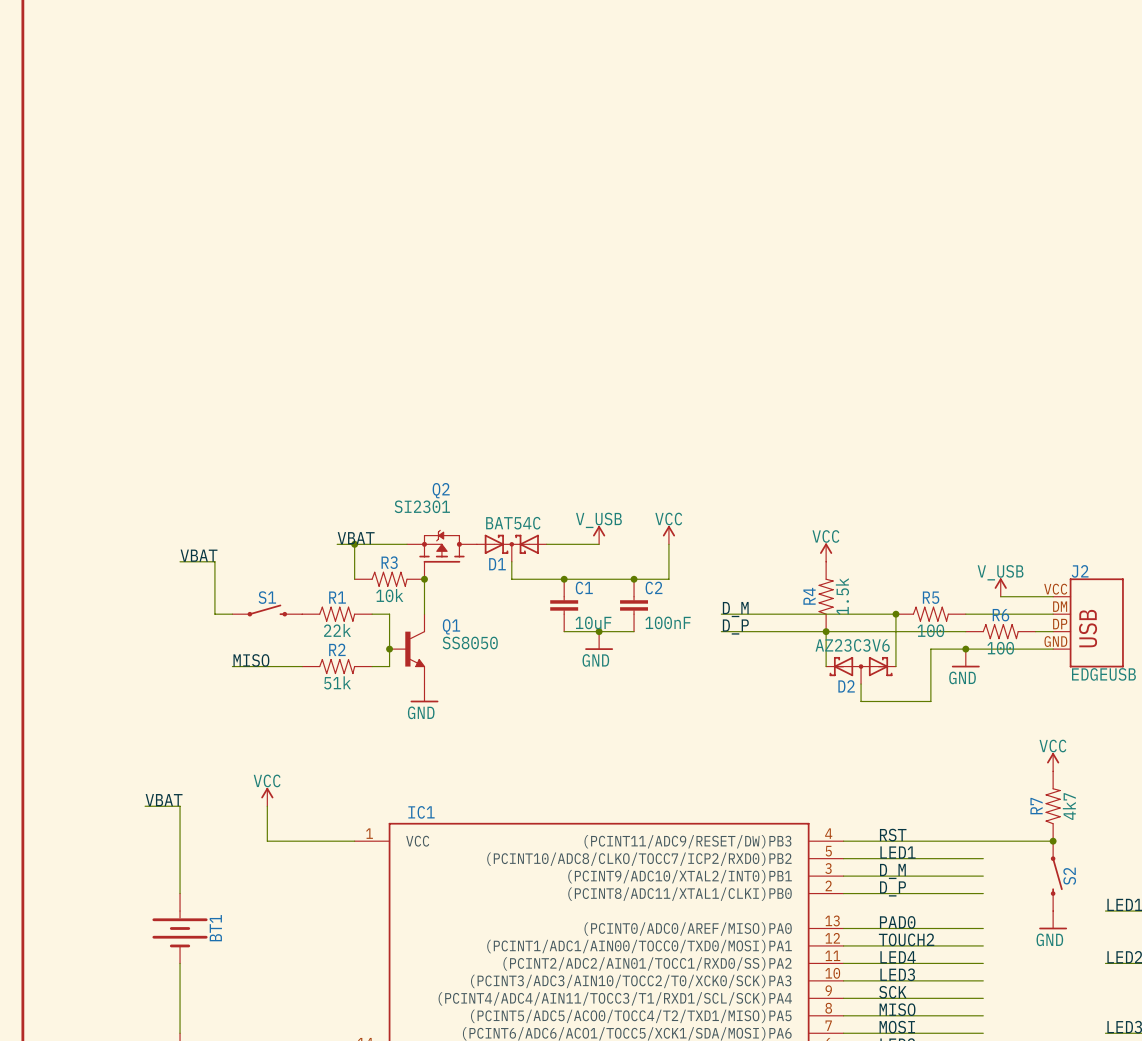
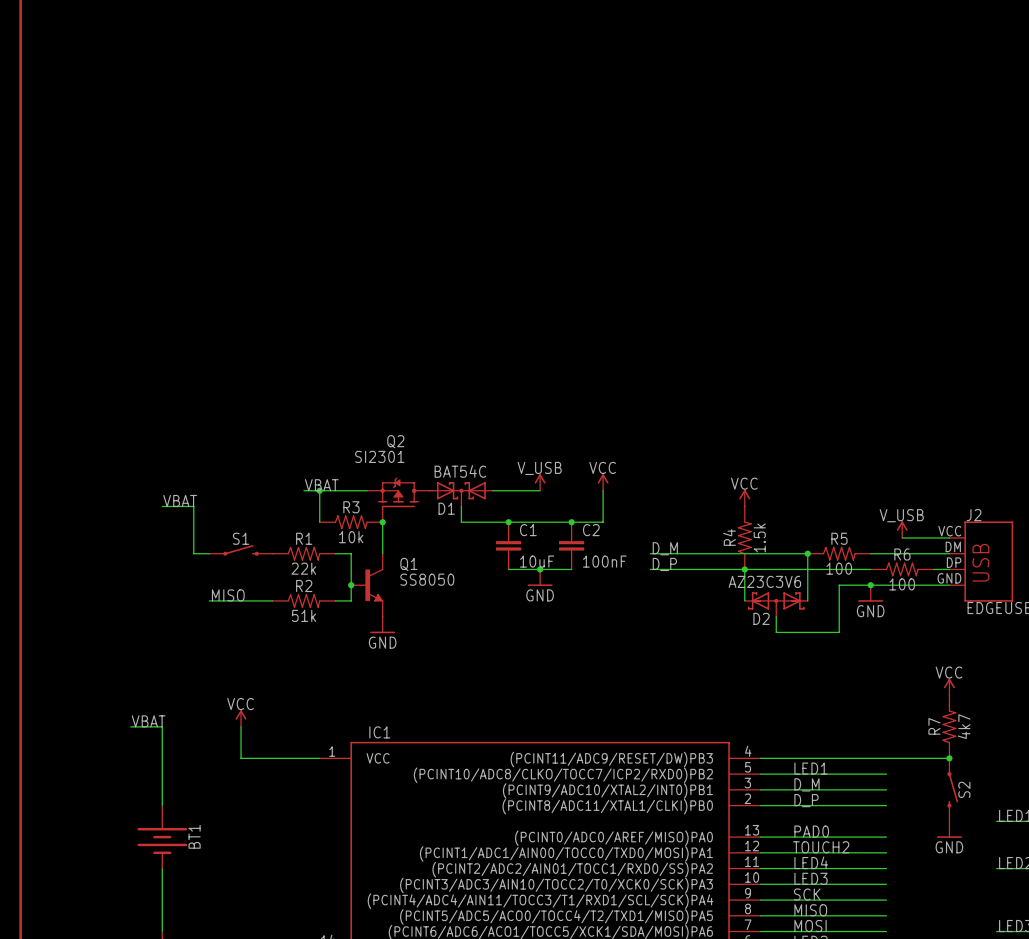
label: RST (893, 835) -> none

